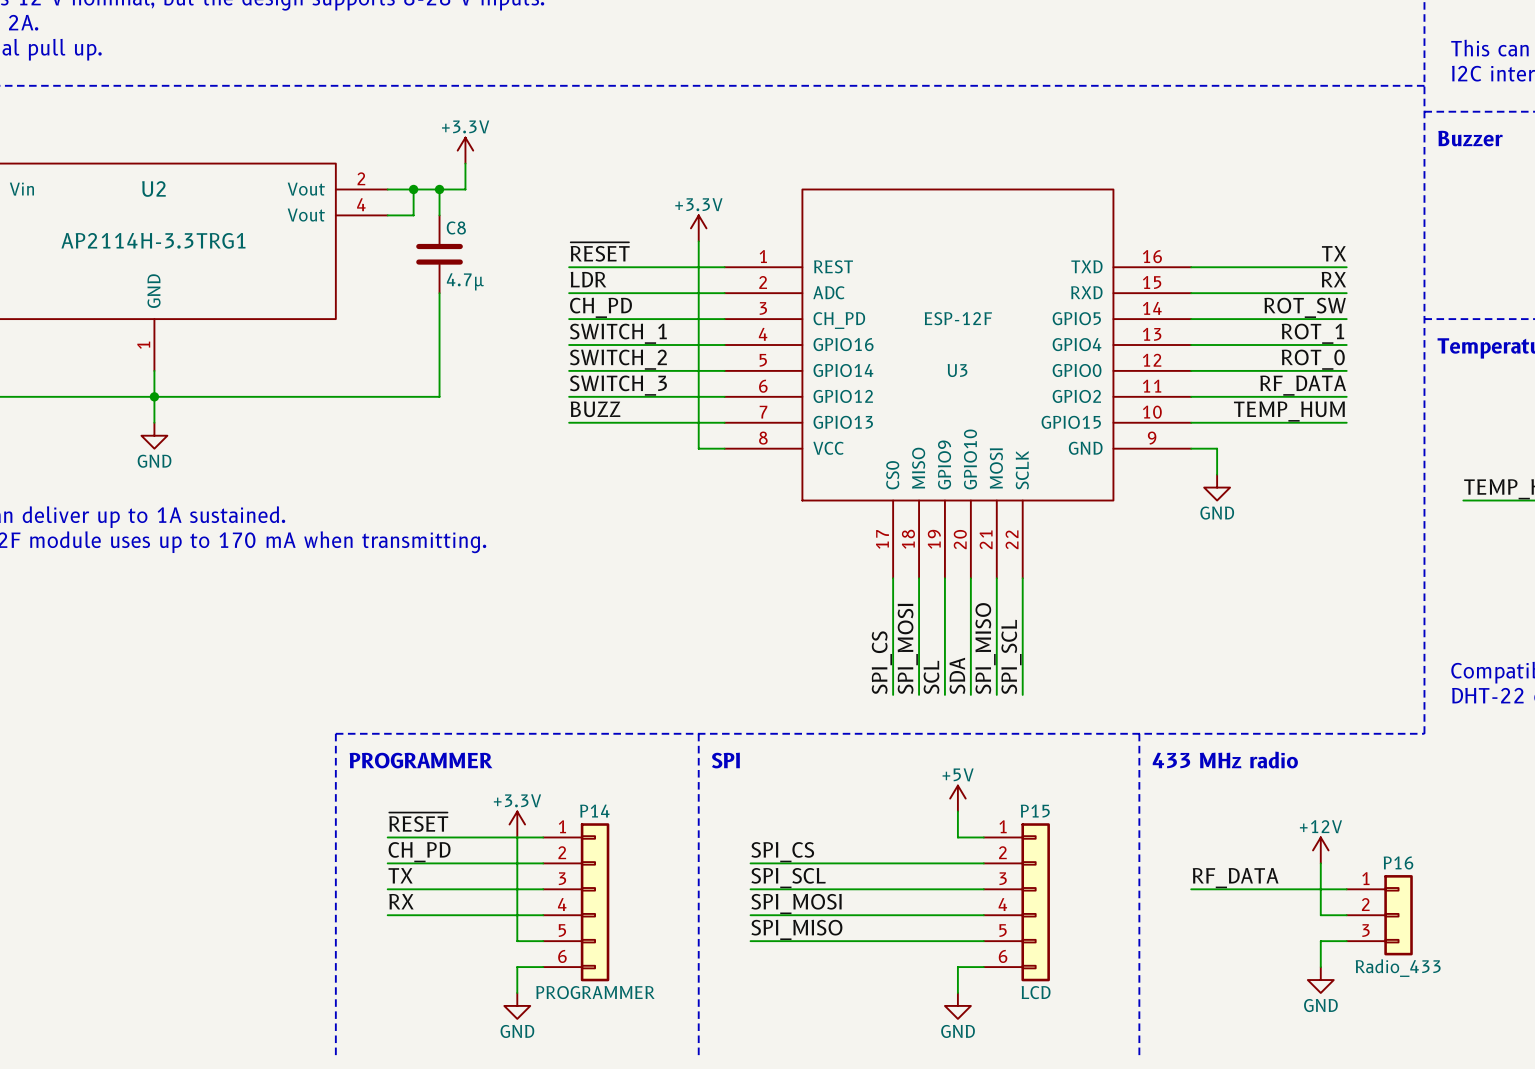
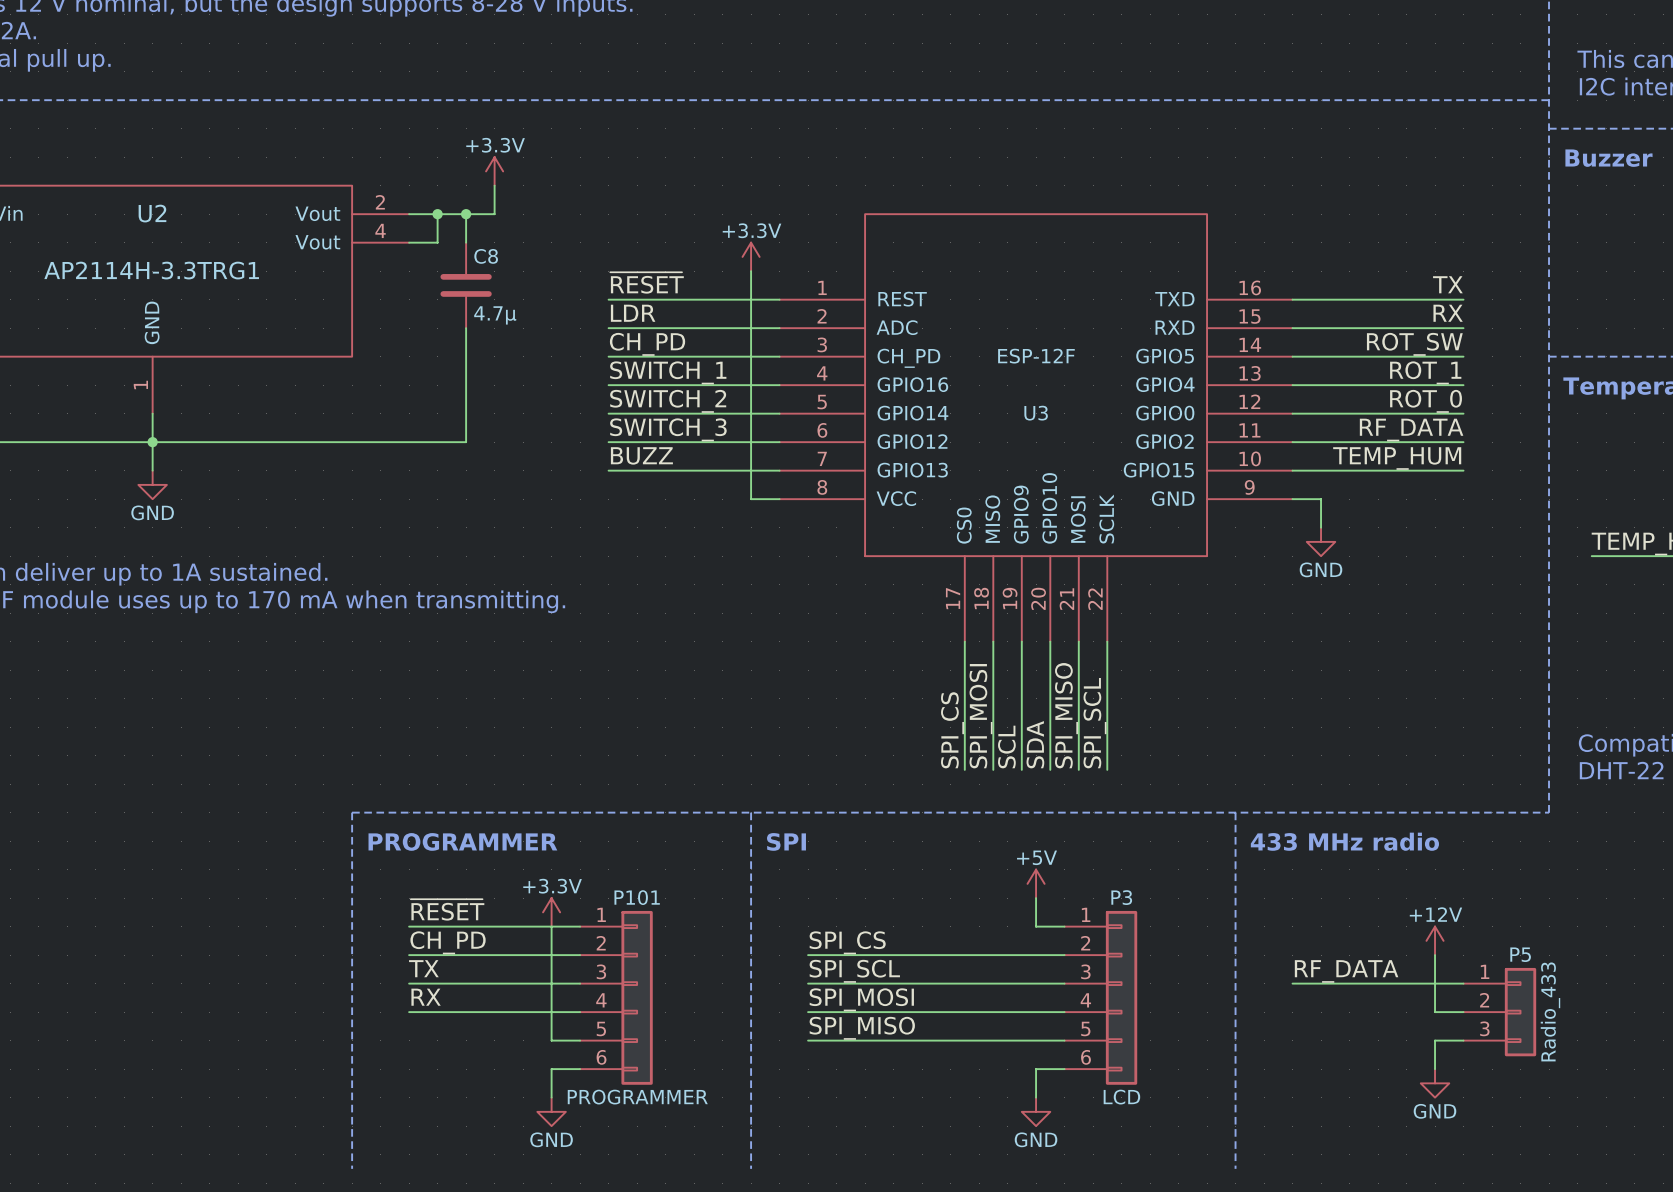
P14 name: P14 (594, 811) -> P101 (637, 897)
P15 name: P15 (1035, 811) -> P3 (1121, 897)
P16 name: P16 (1398, 862) -> P5 (1520, 954)
P16 value rotation: 0° (1398, 968) -> 90° counterclockwise (1550, 1011)

